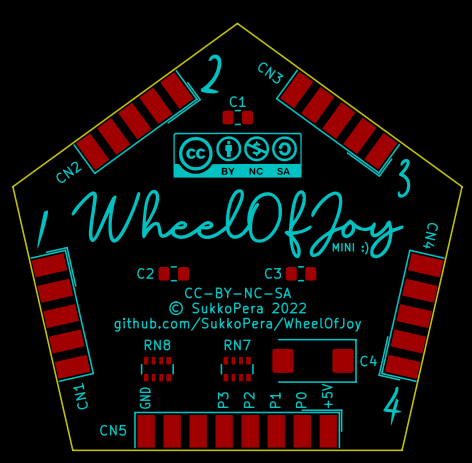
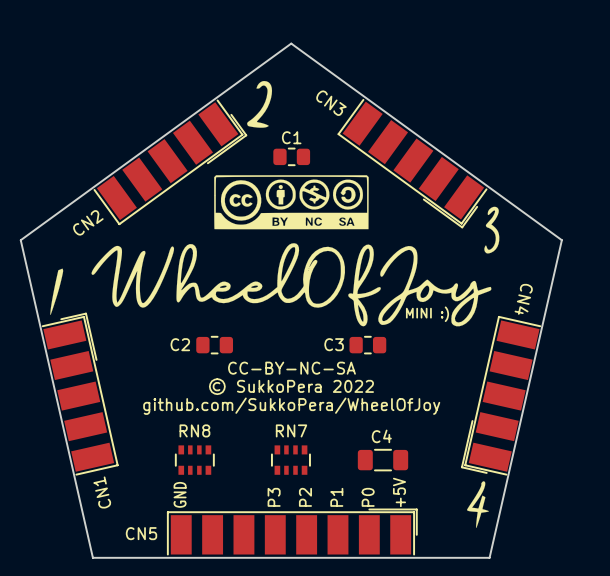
C4 footprint: [272, 339, 357, 383] -> [357, 449, 409, 472]
C4 name position: C4 (368, 360) -> C4 (381, 436)

